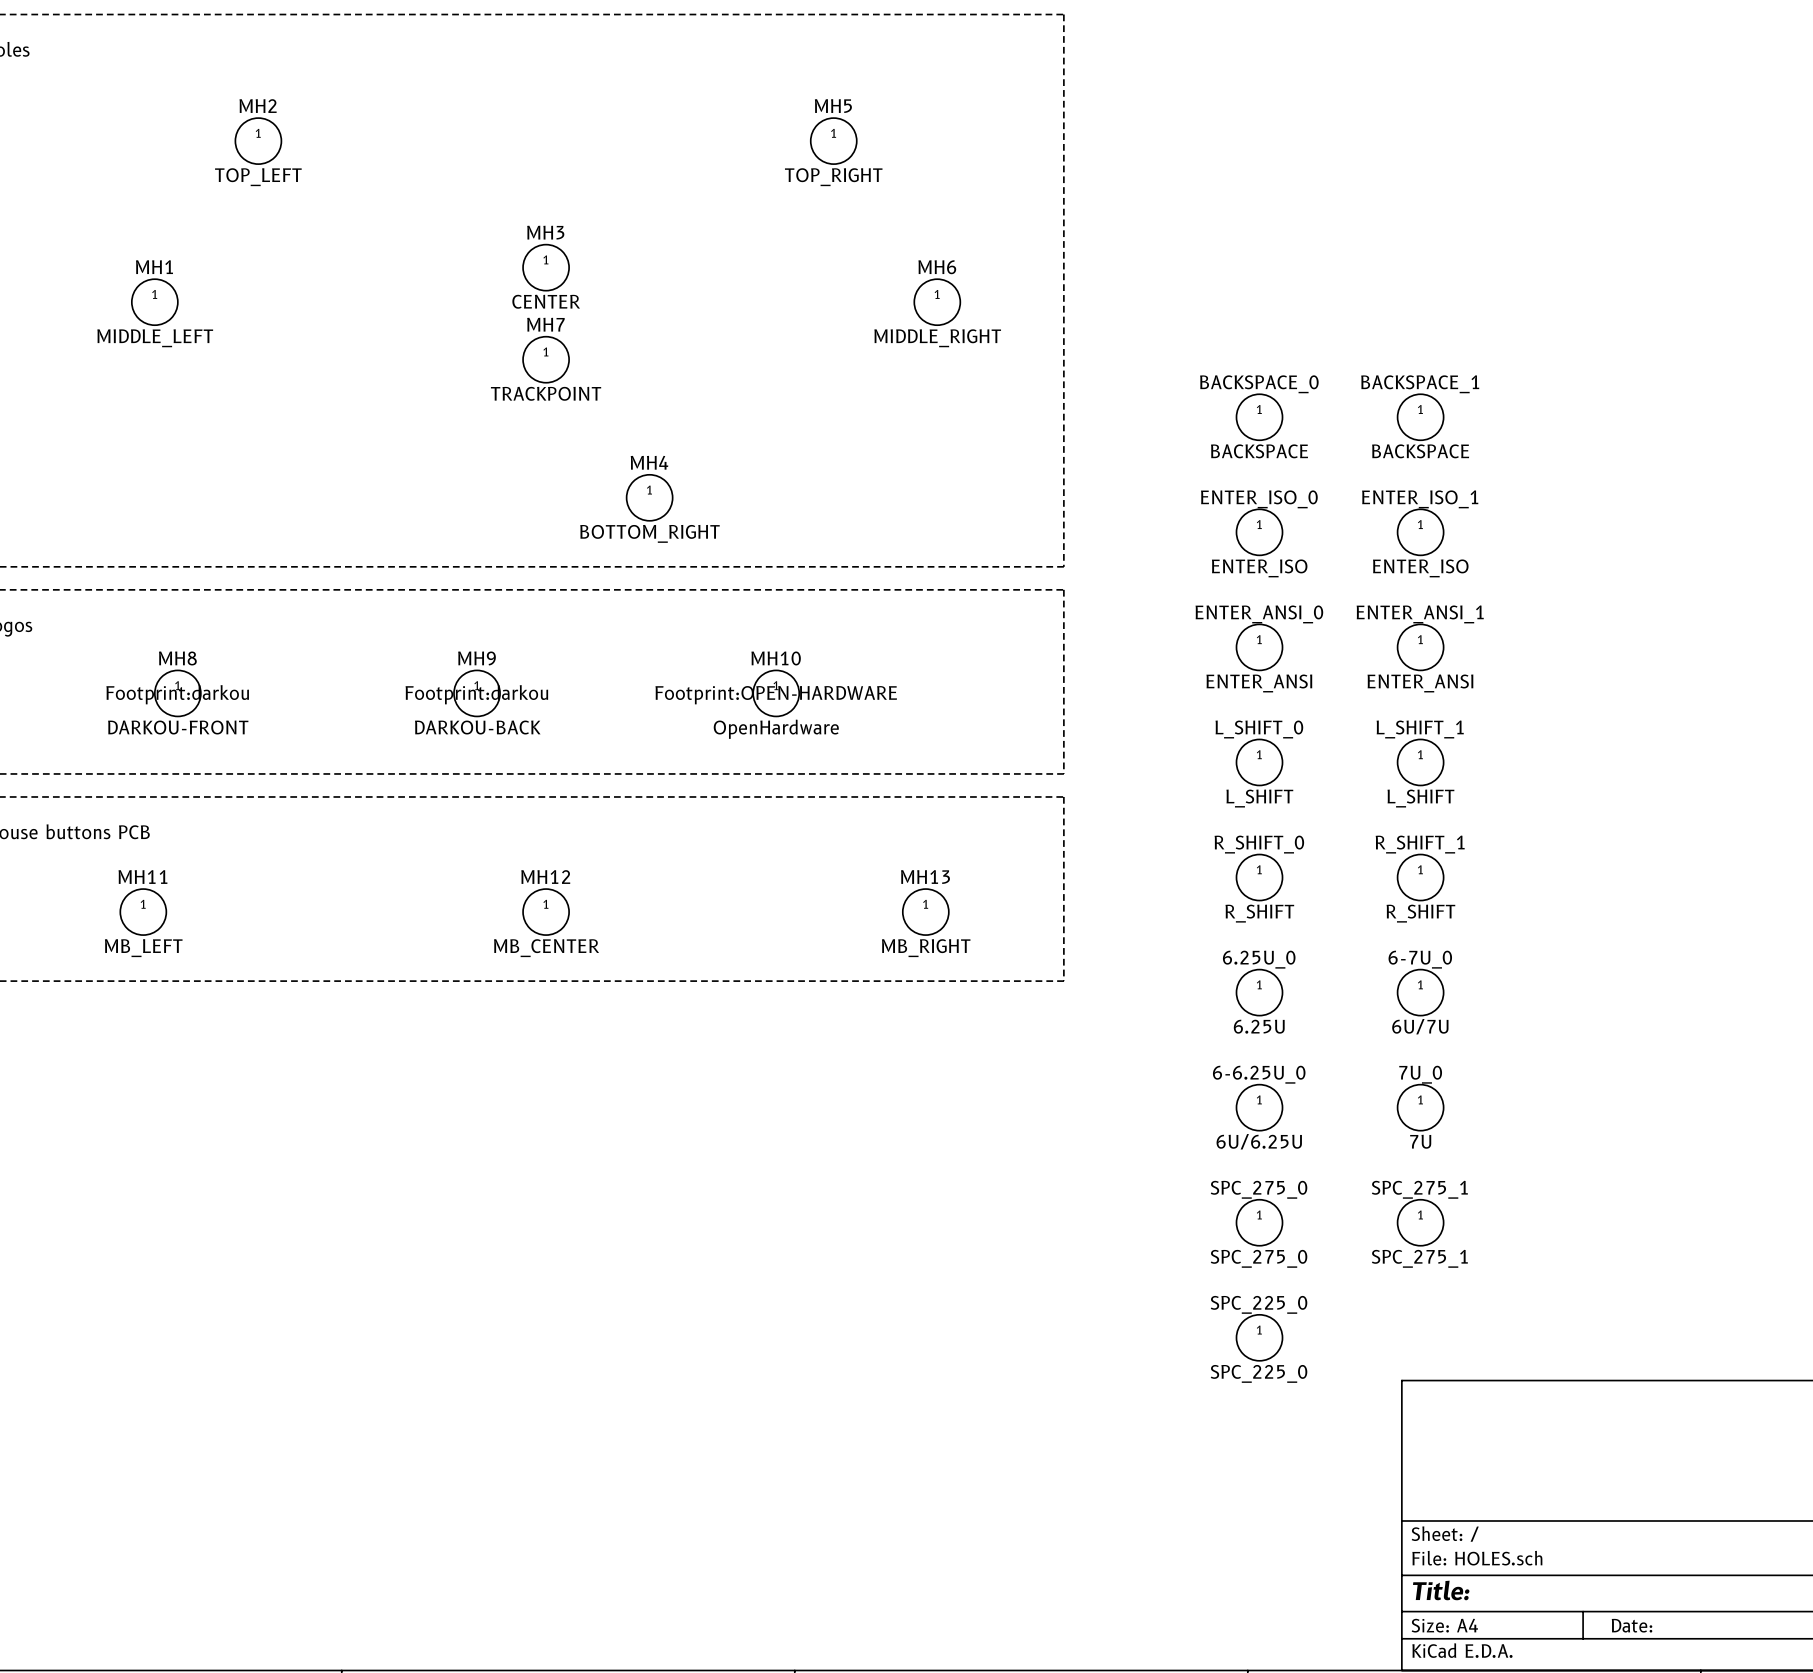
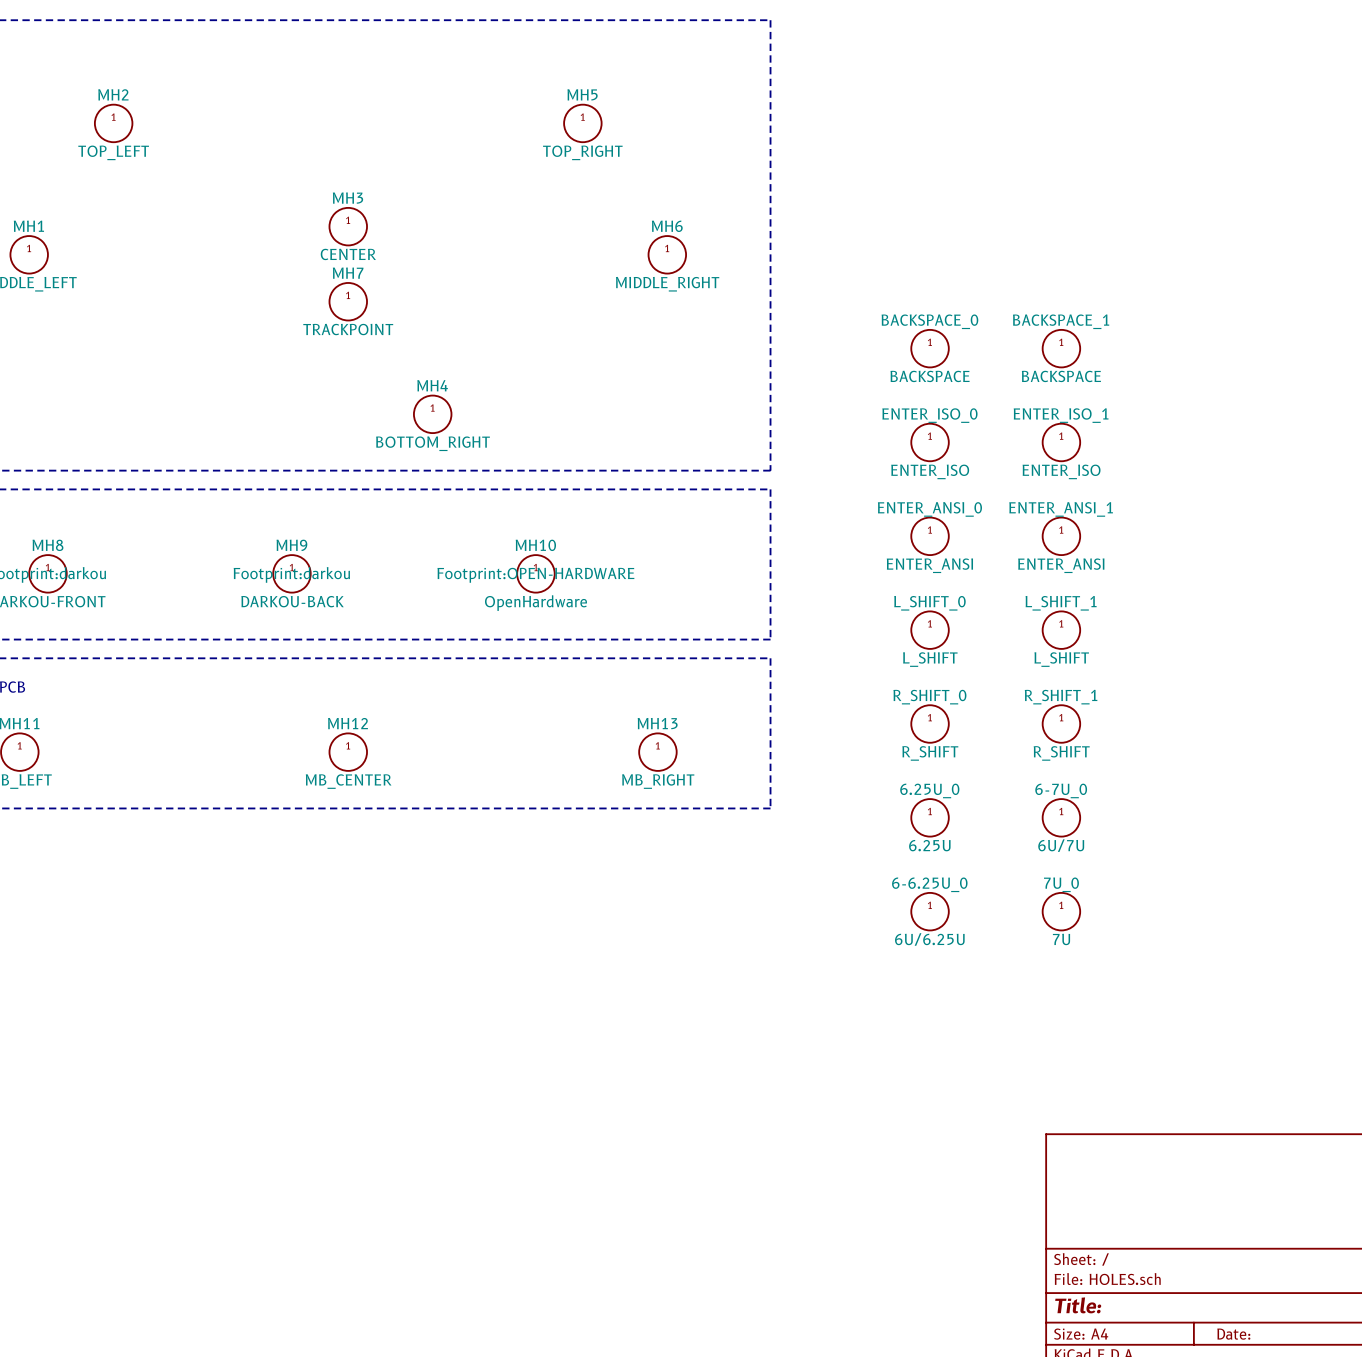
SPC_275_0: SPC_275_0 (1259, 1222) -> none
SPC_275_1: SPC_275_1 (1420, 1222) -> none
SPC_225_0: SPC_225_0 (1259, 1337) -> none

